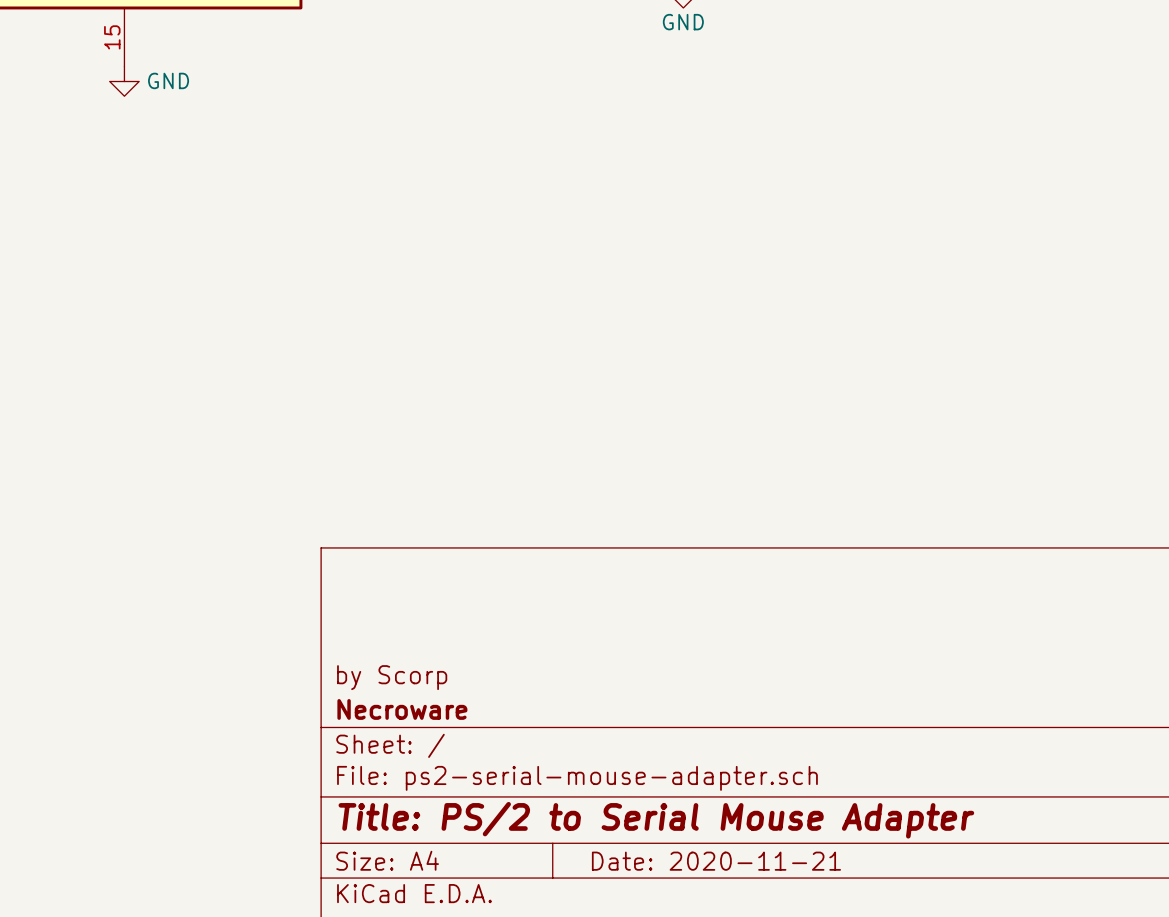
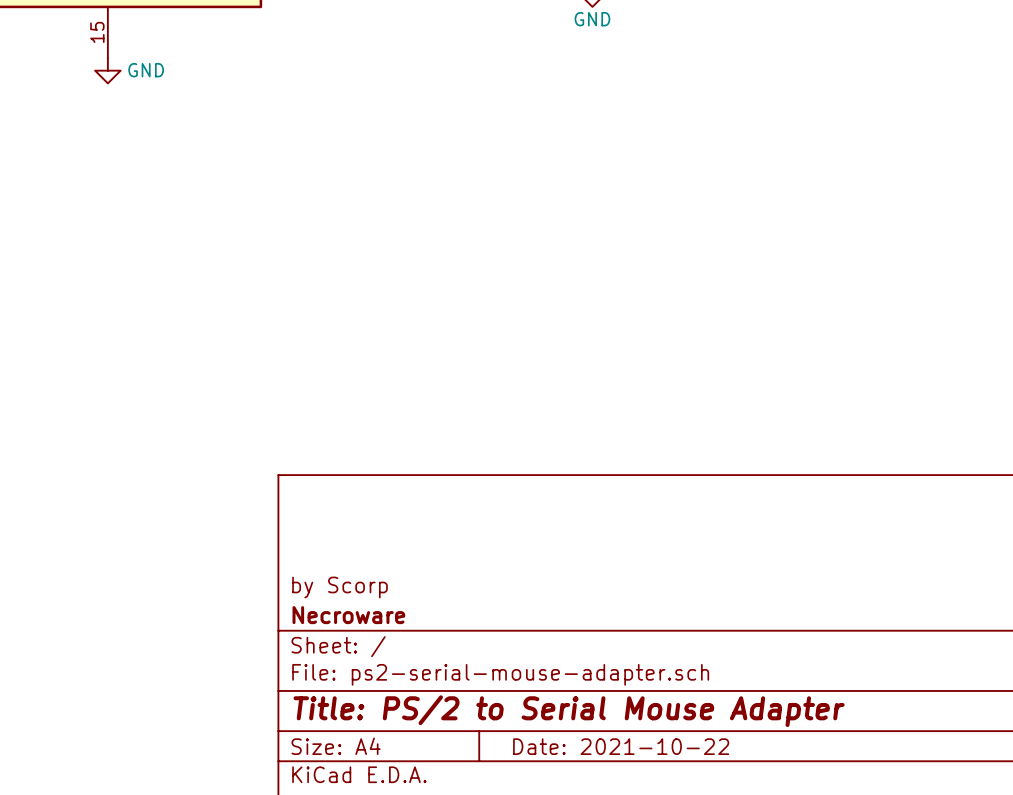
title block: Date: 2020-11-21 (716, 861) -> Date: 2021-10-22 (621, 746)

